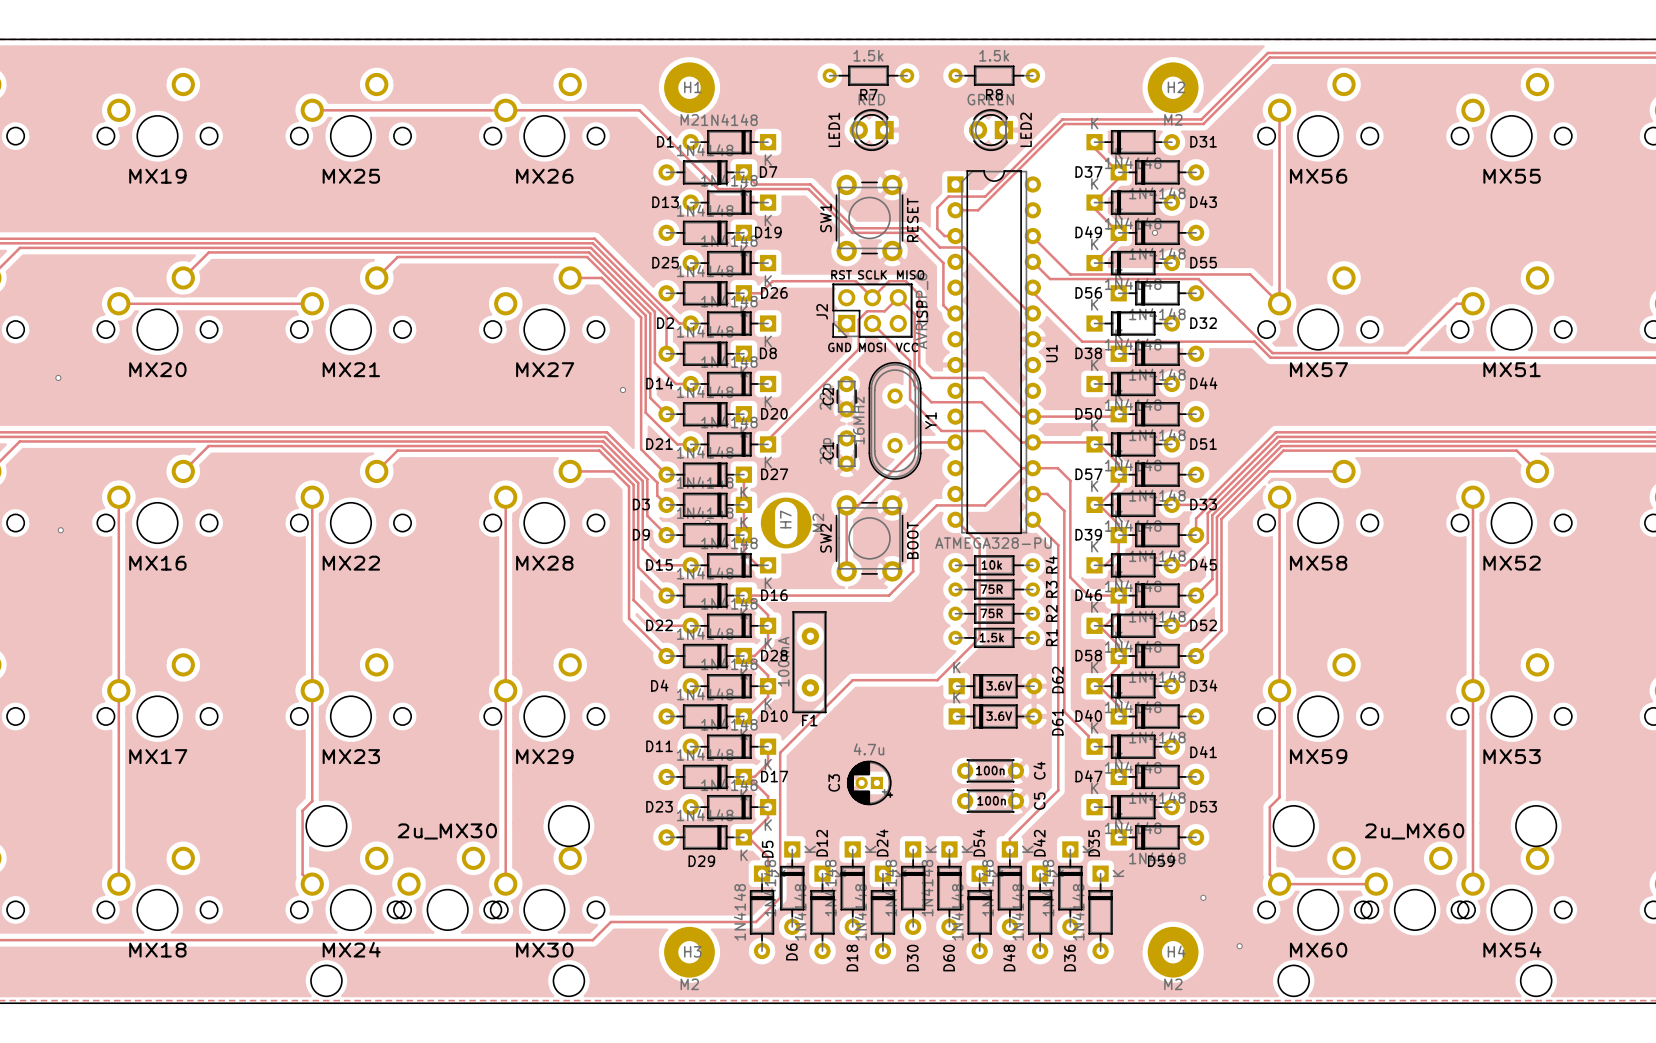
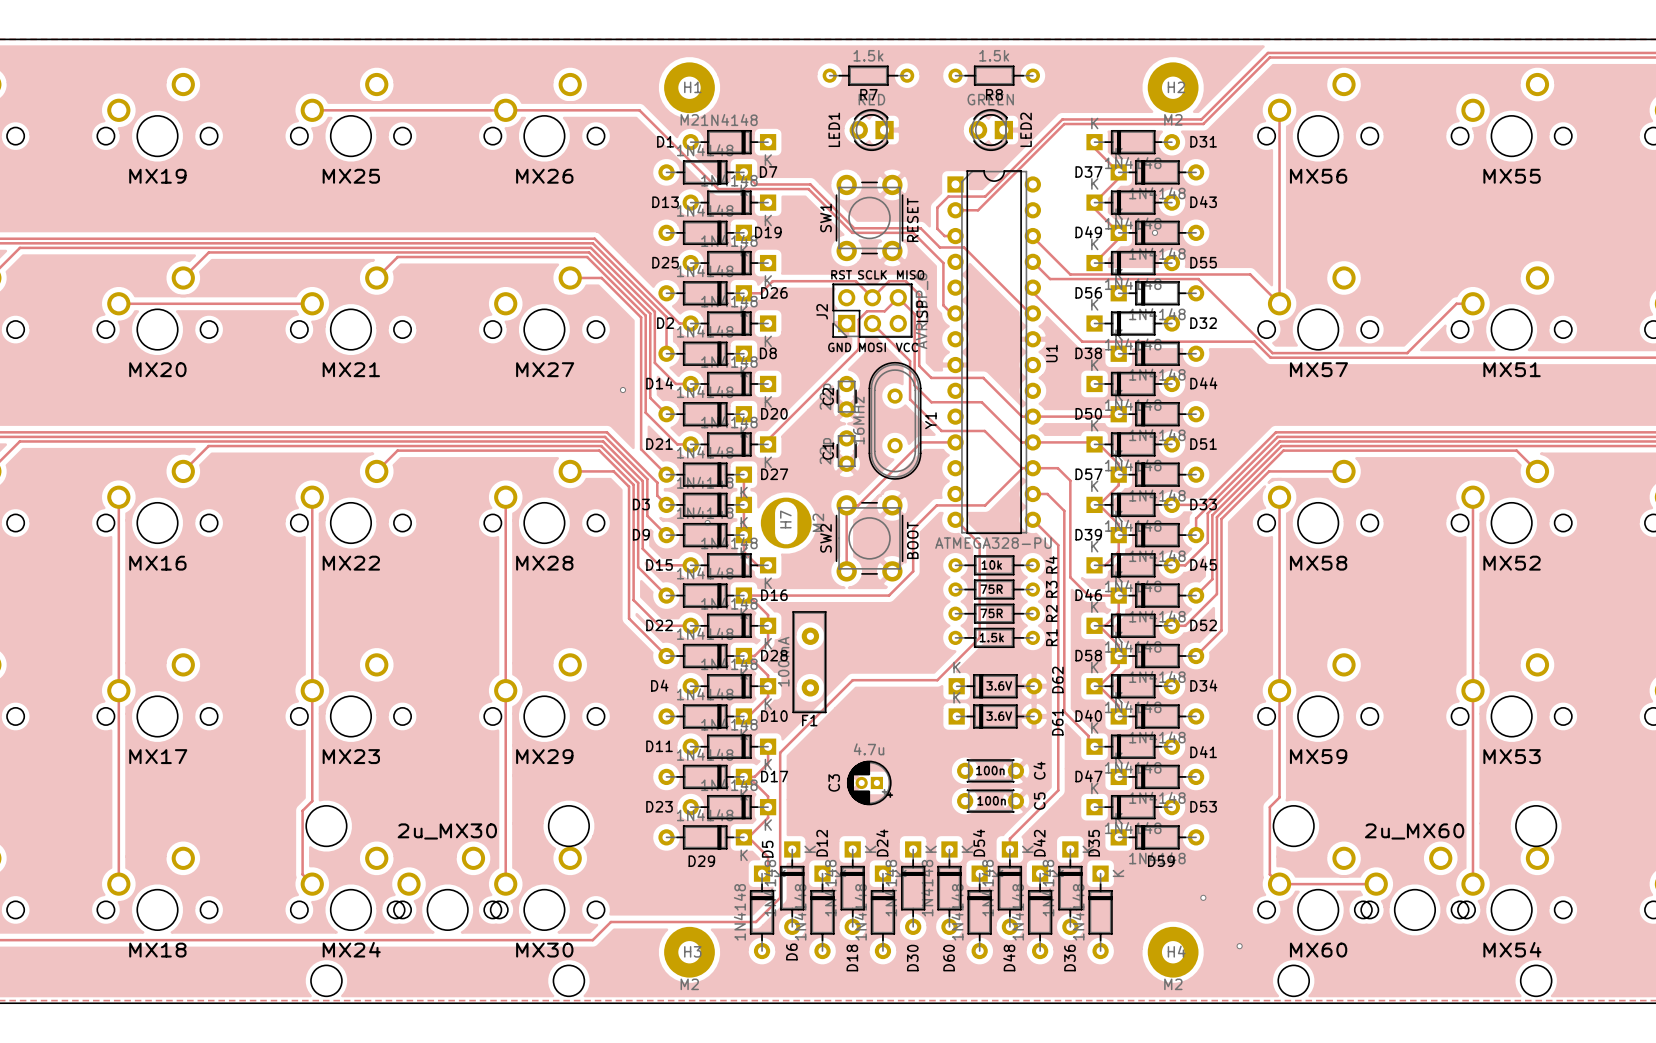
via: (58, 377) -> none
via: (60, 530) -> none

